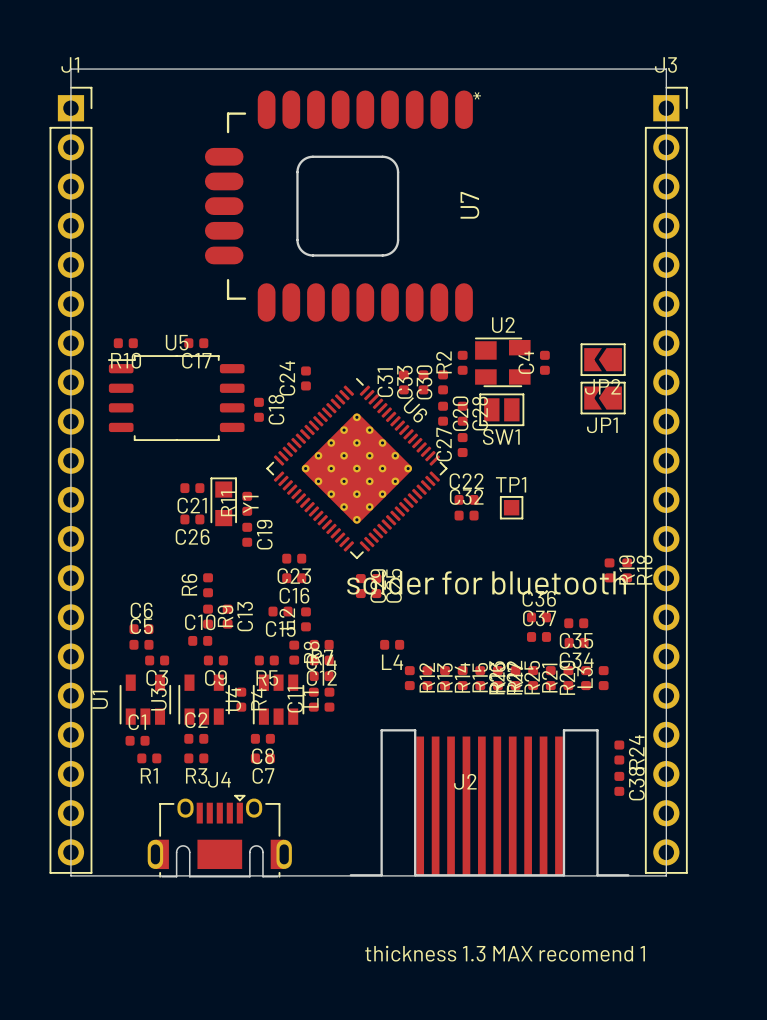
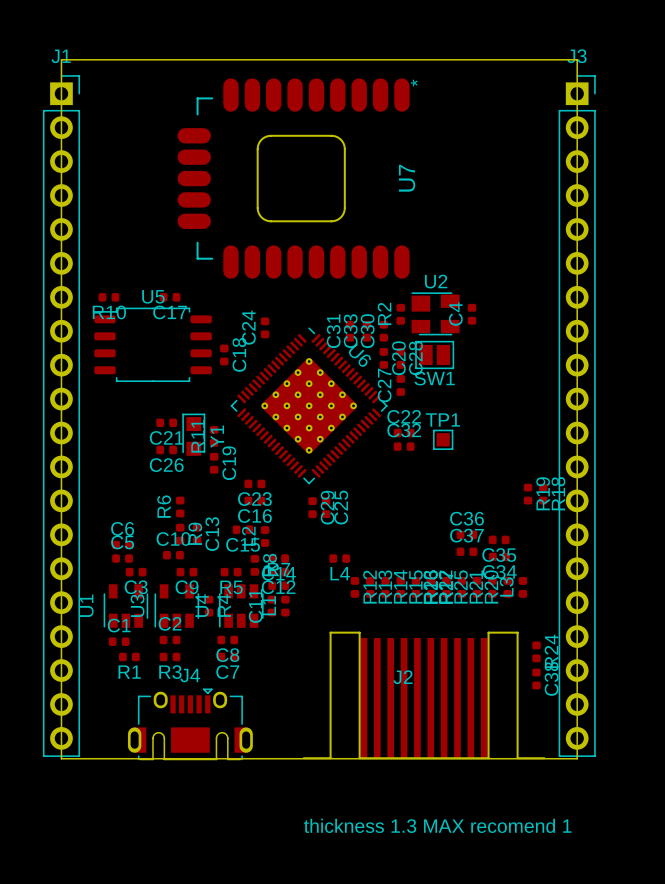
JP2: (603, 359) -> none
JP1: (603, 398) -> none
text: solder for bluetooth (486, 583) -> none

